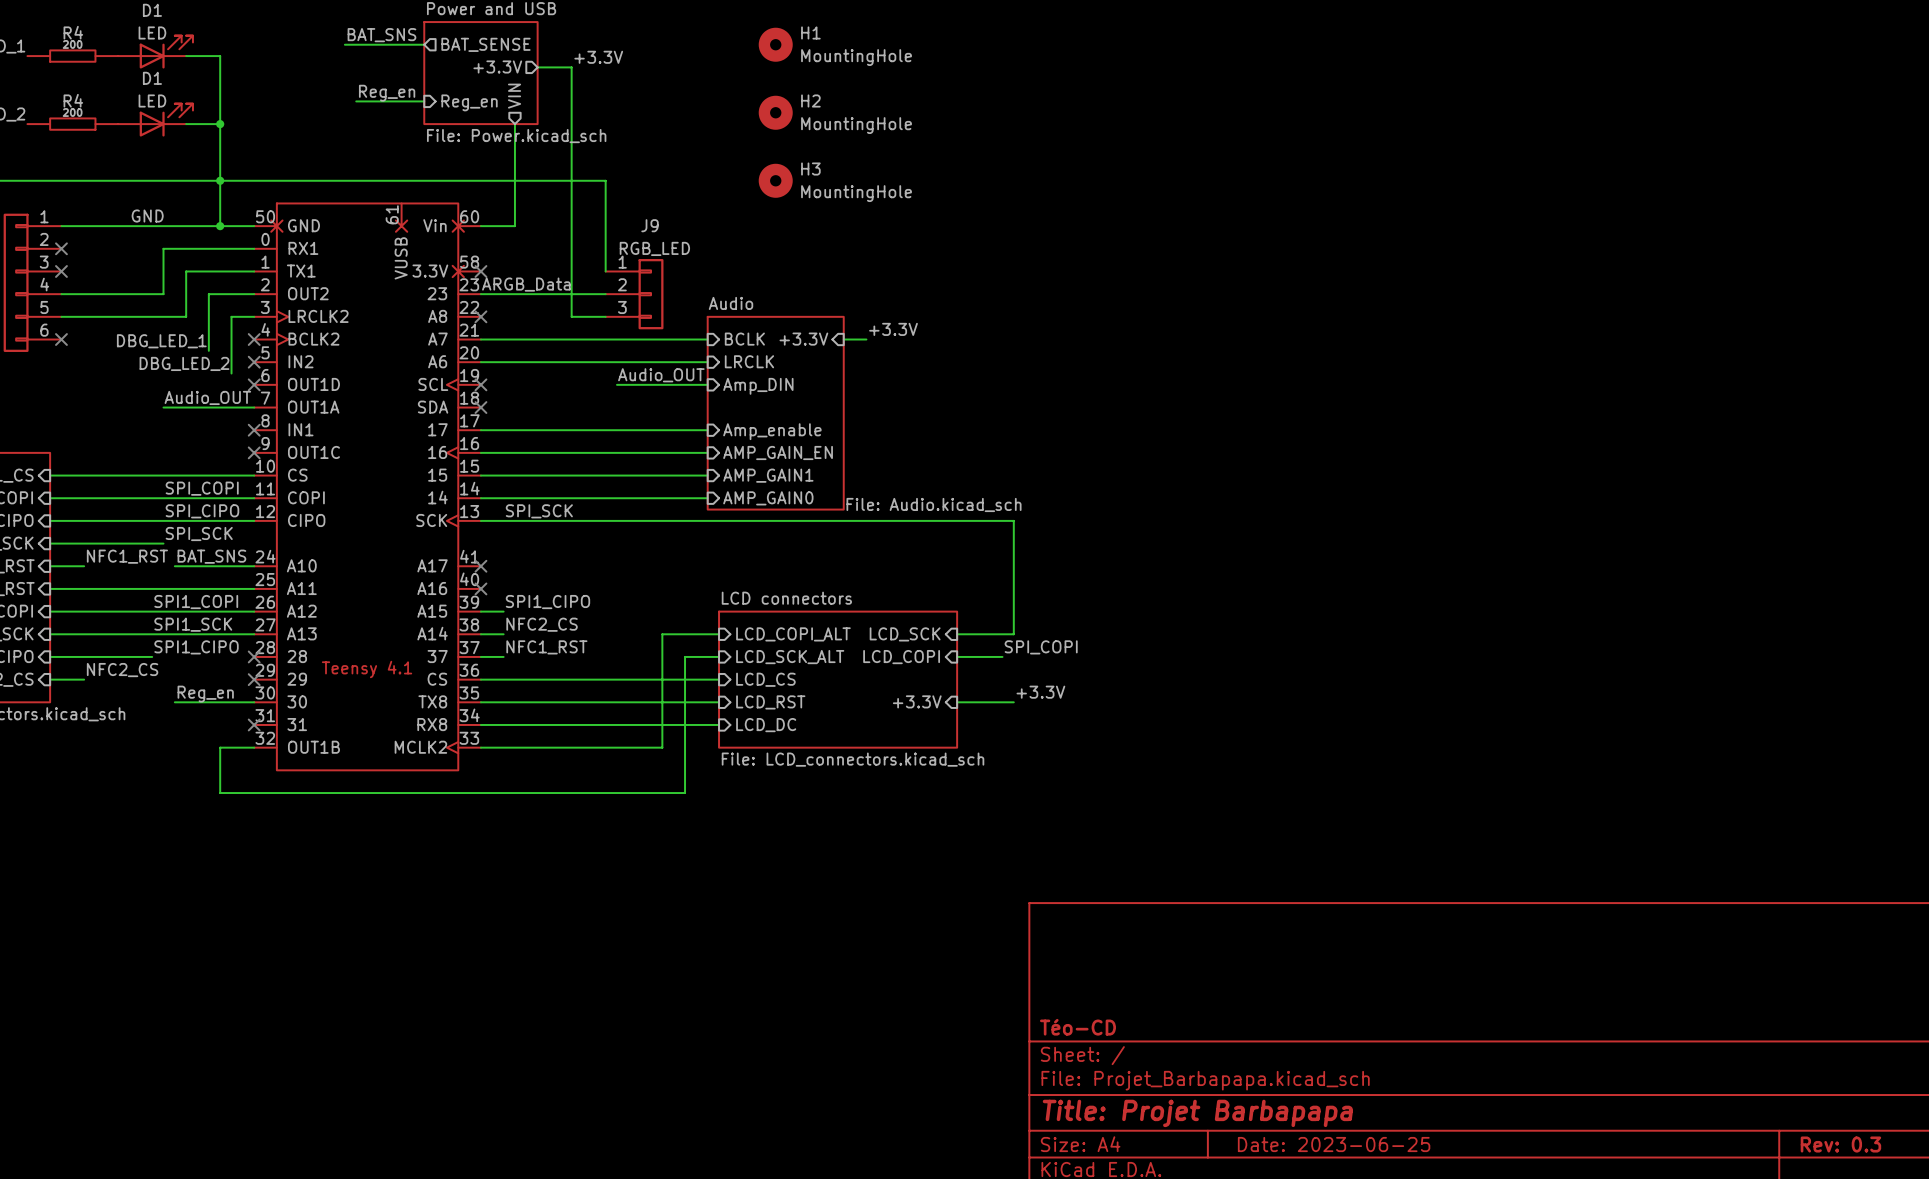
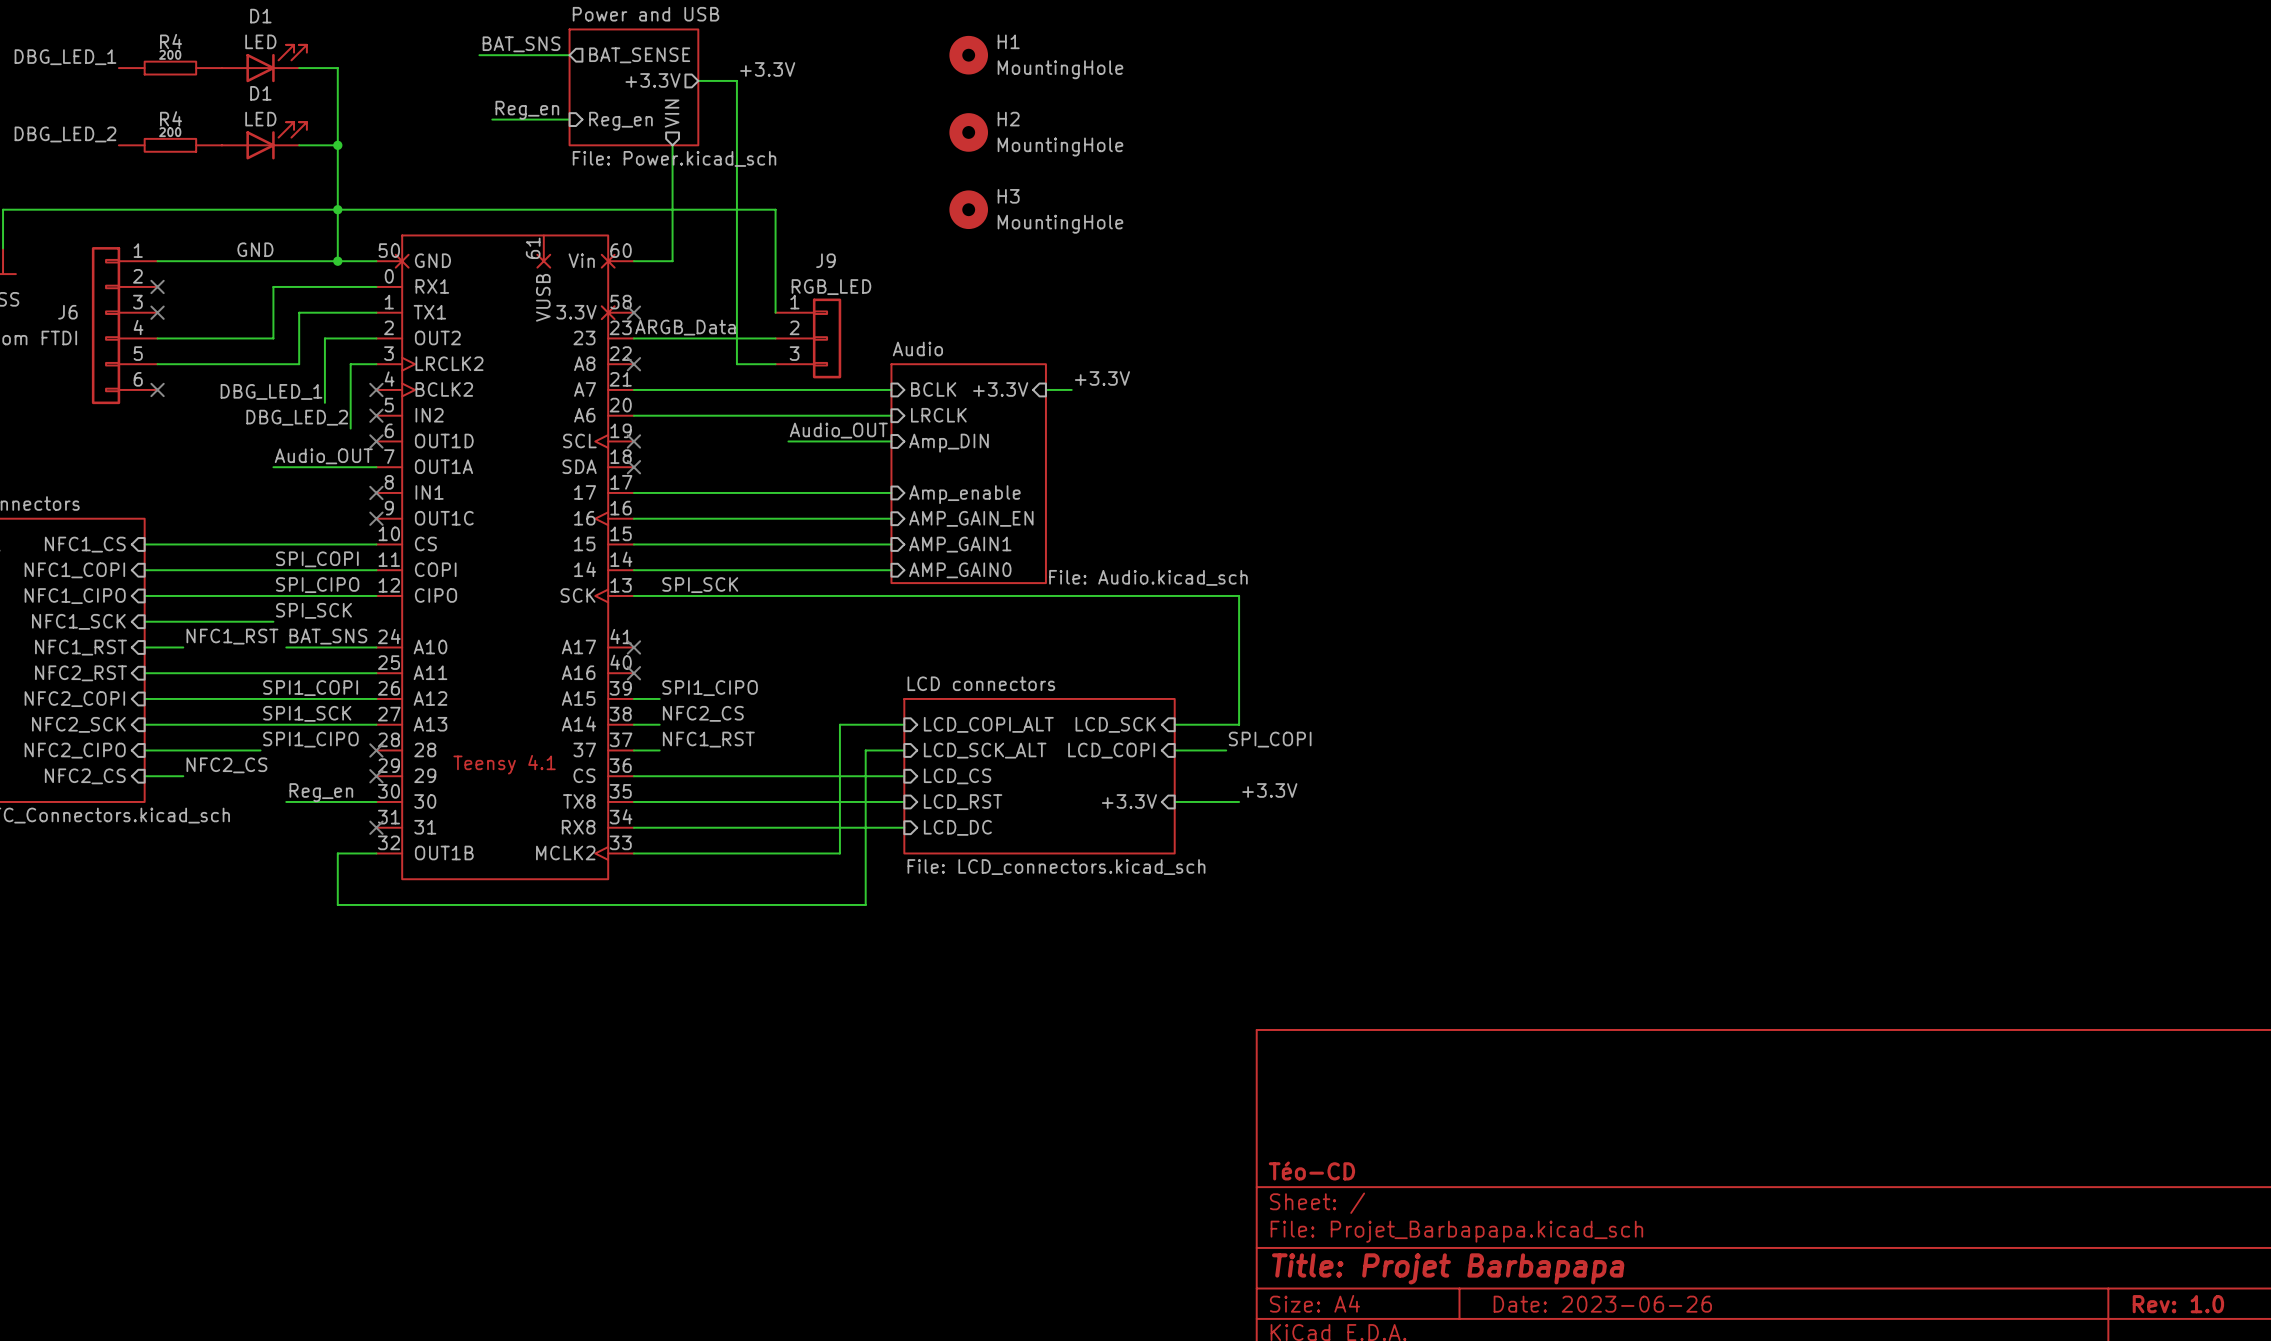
title block: Date: 2023-06-25 (1334, 1144) -> Date: 2023-06-26 (1602, 1304)
title block: Rev: 0.3 (1840, 1144) -> Rev: 1.0 (2178, 1304)

